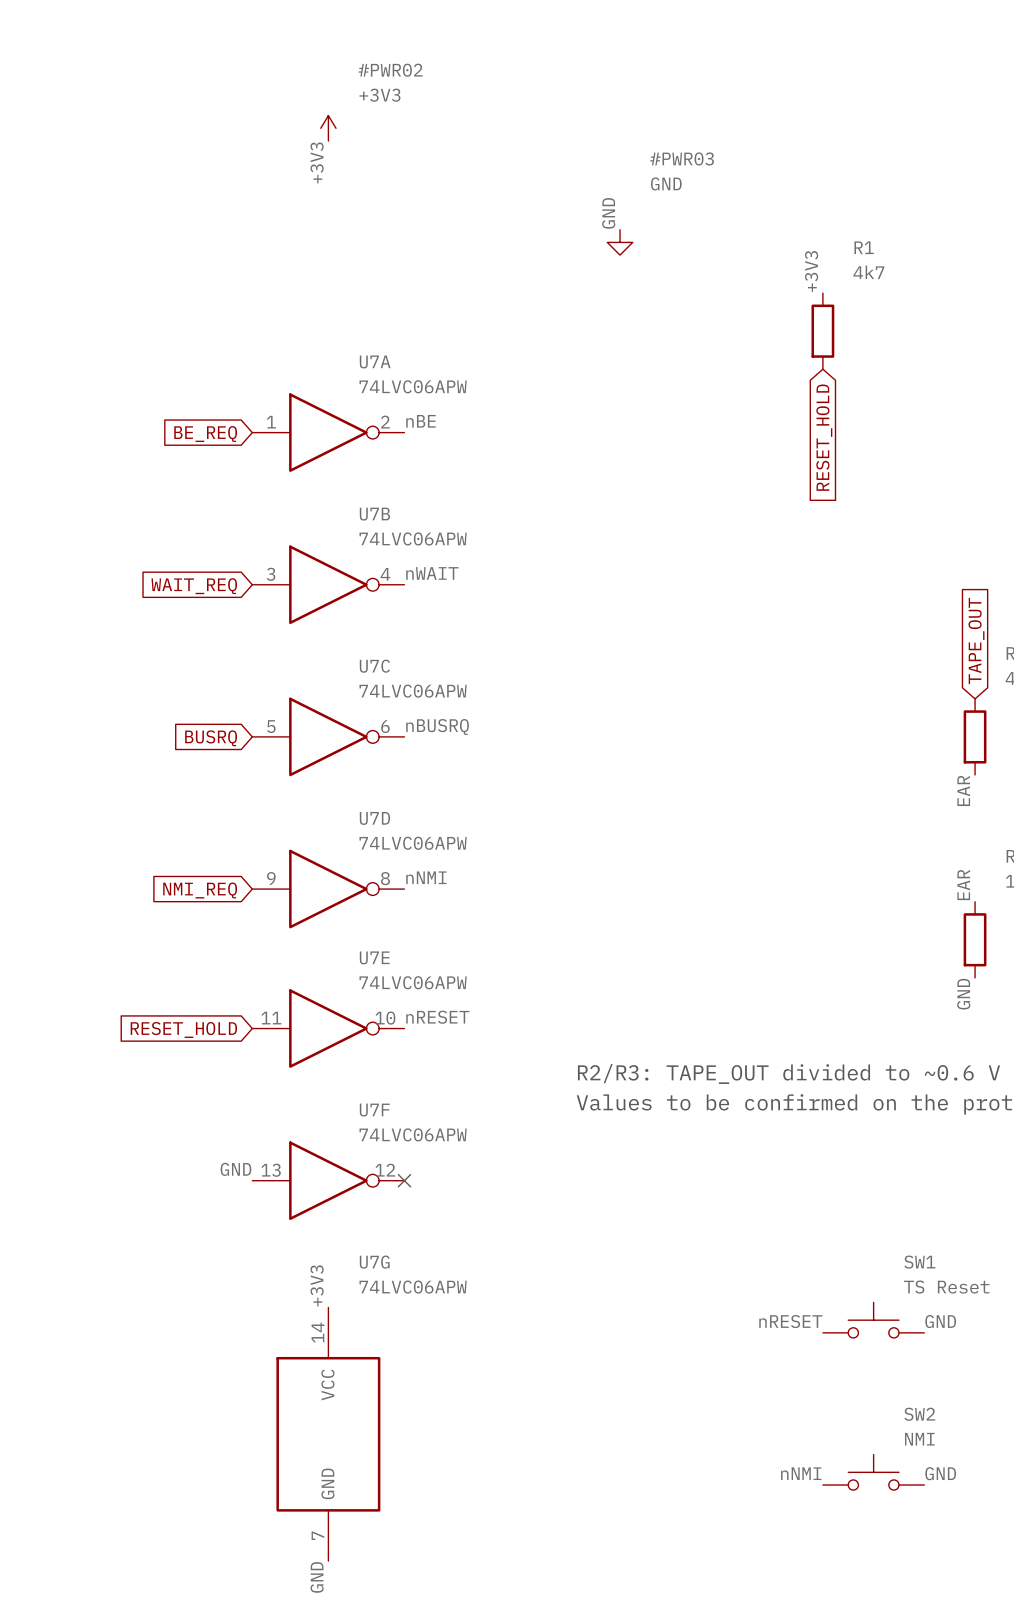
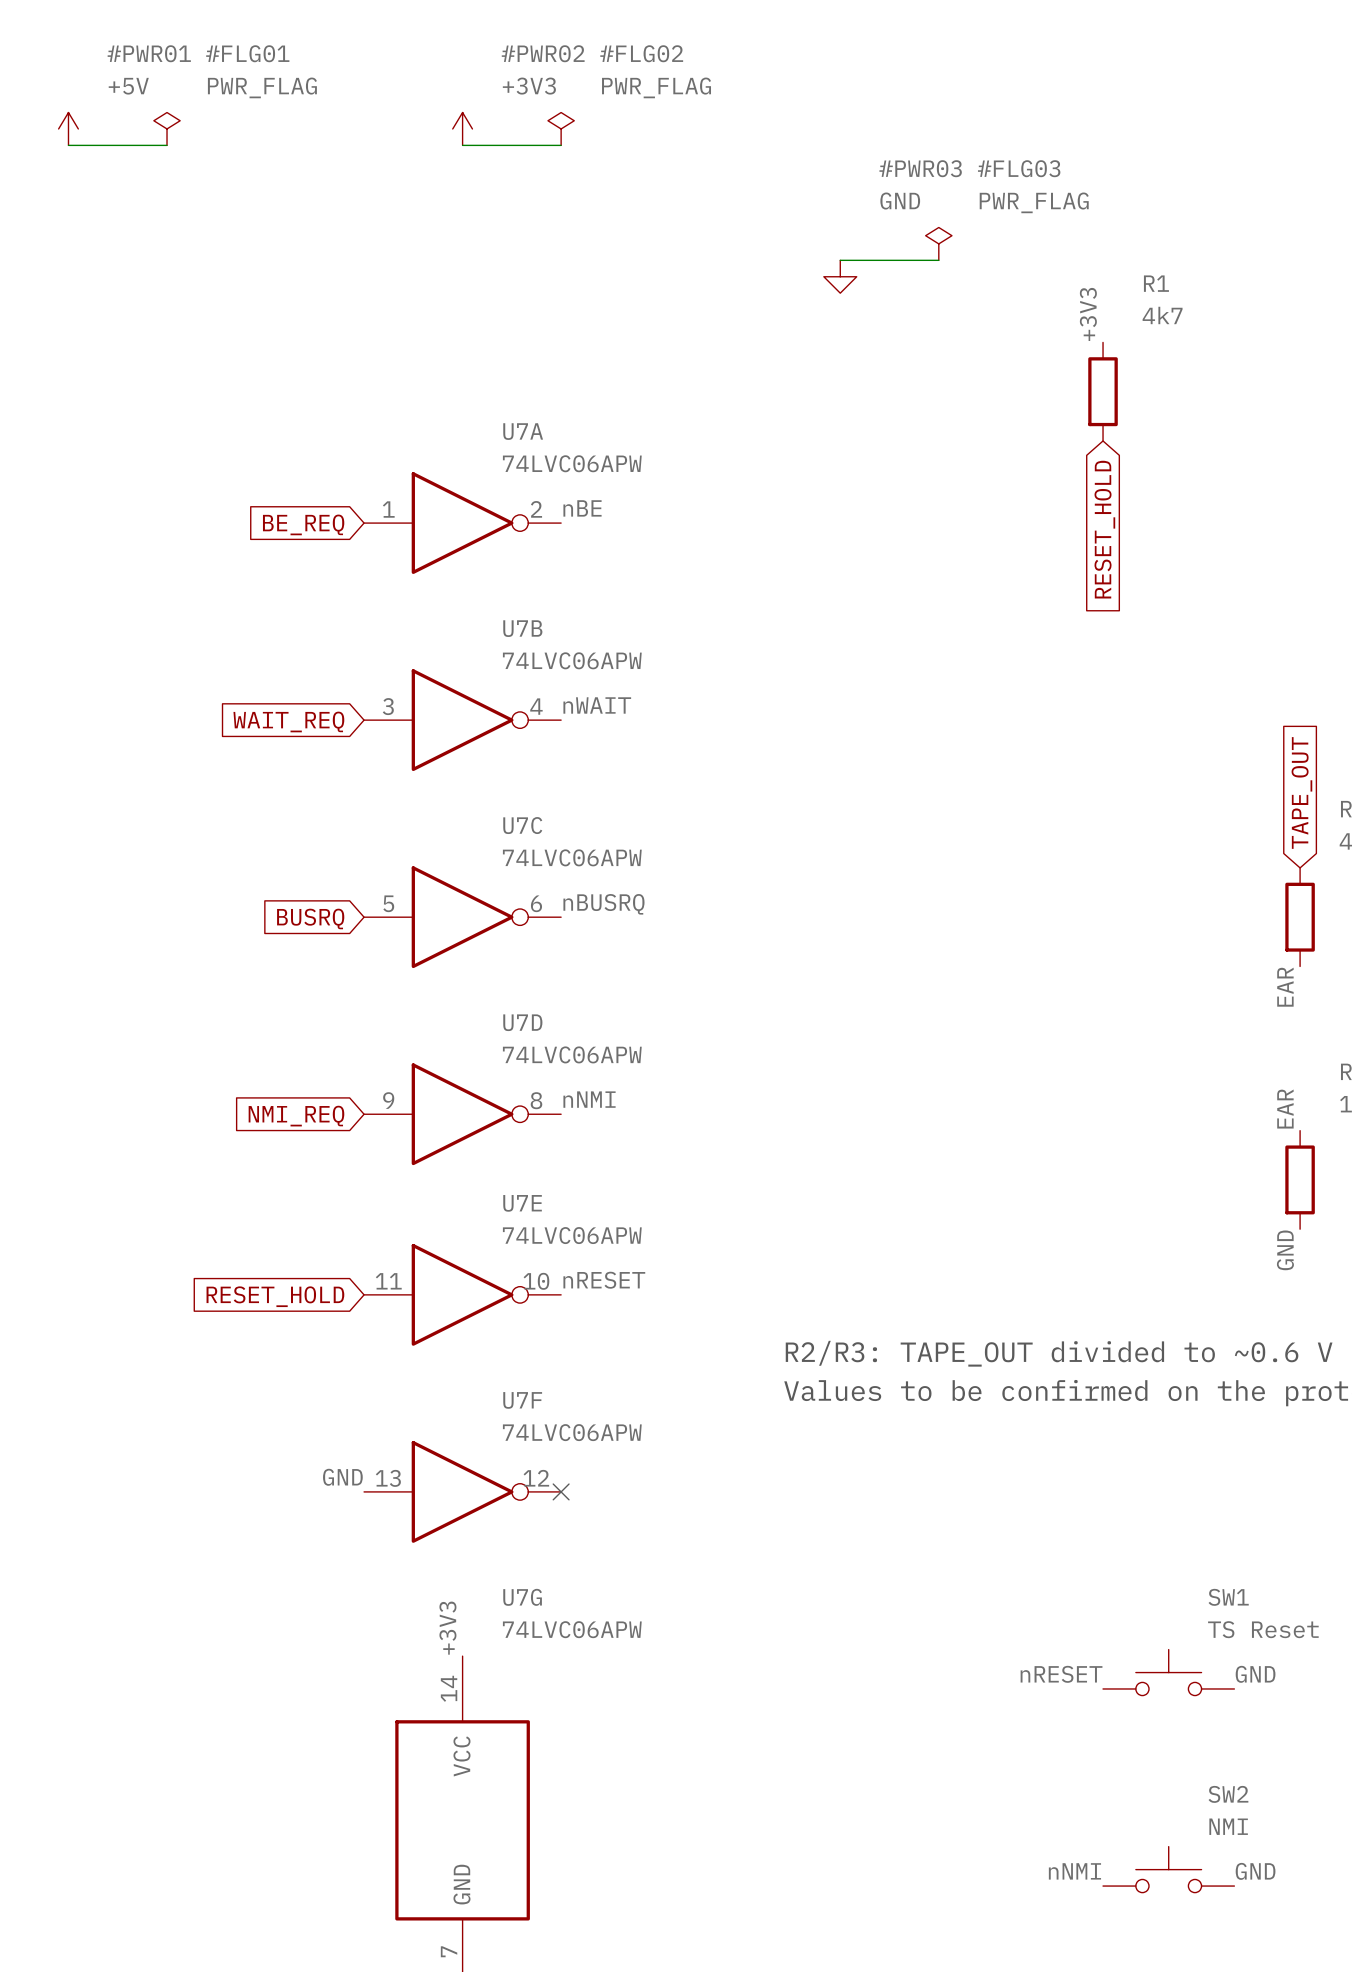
#PWR01: none -> +5V (68, 128)
#FLG01: none -> PWR_FLAG (167, 128)
#FLG02: none -> PWR_FLAG (561, 128)
wire: none -> (68, 145) (167, 145)
wire: none -> (462, 145) (561, 145)
label: +3V3 (317, 162) -> none
label: GND (608, 213) -> none
#FLG03: none -> PWR_FLAG (938, 243)
wire: none -> (840, 260) (938, 260)

